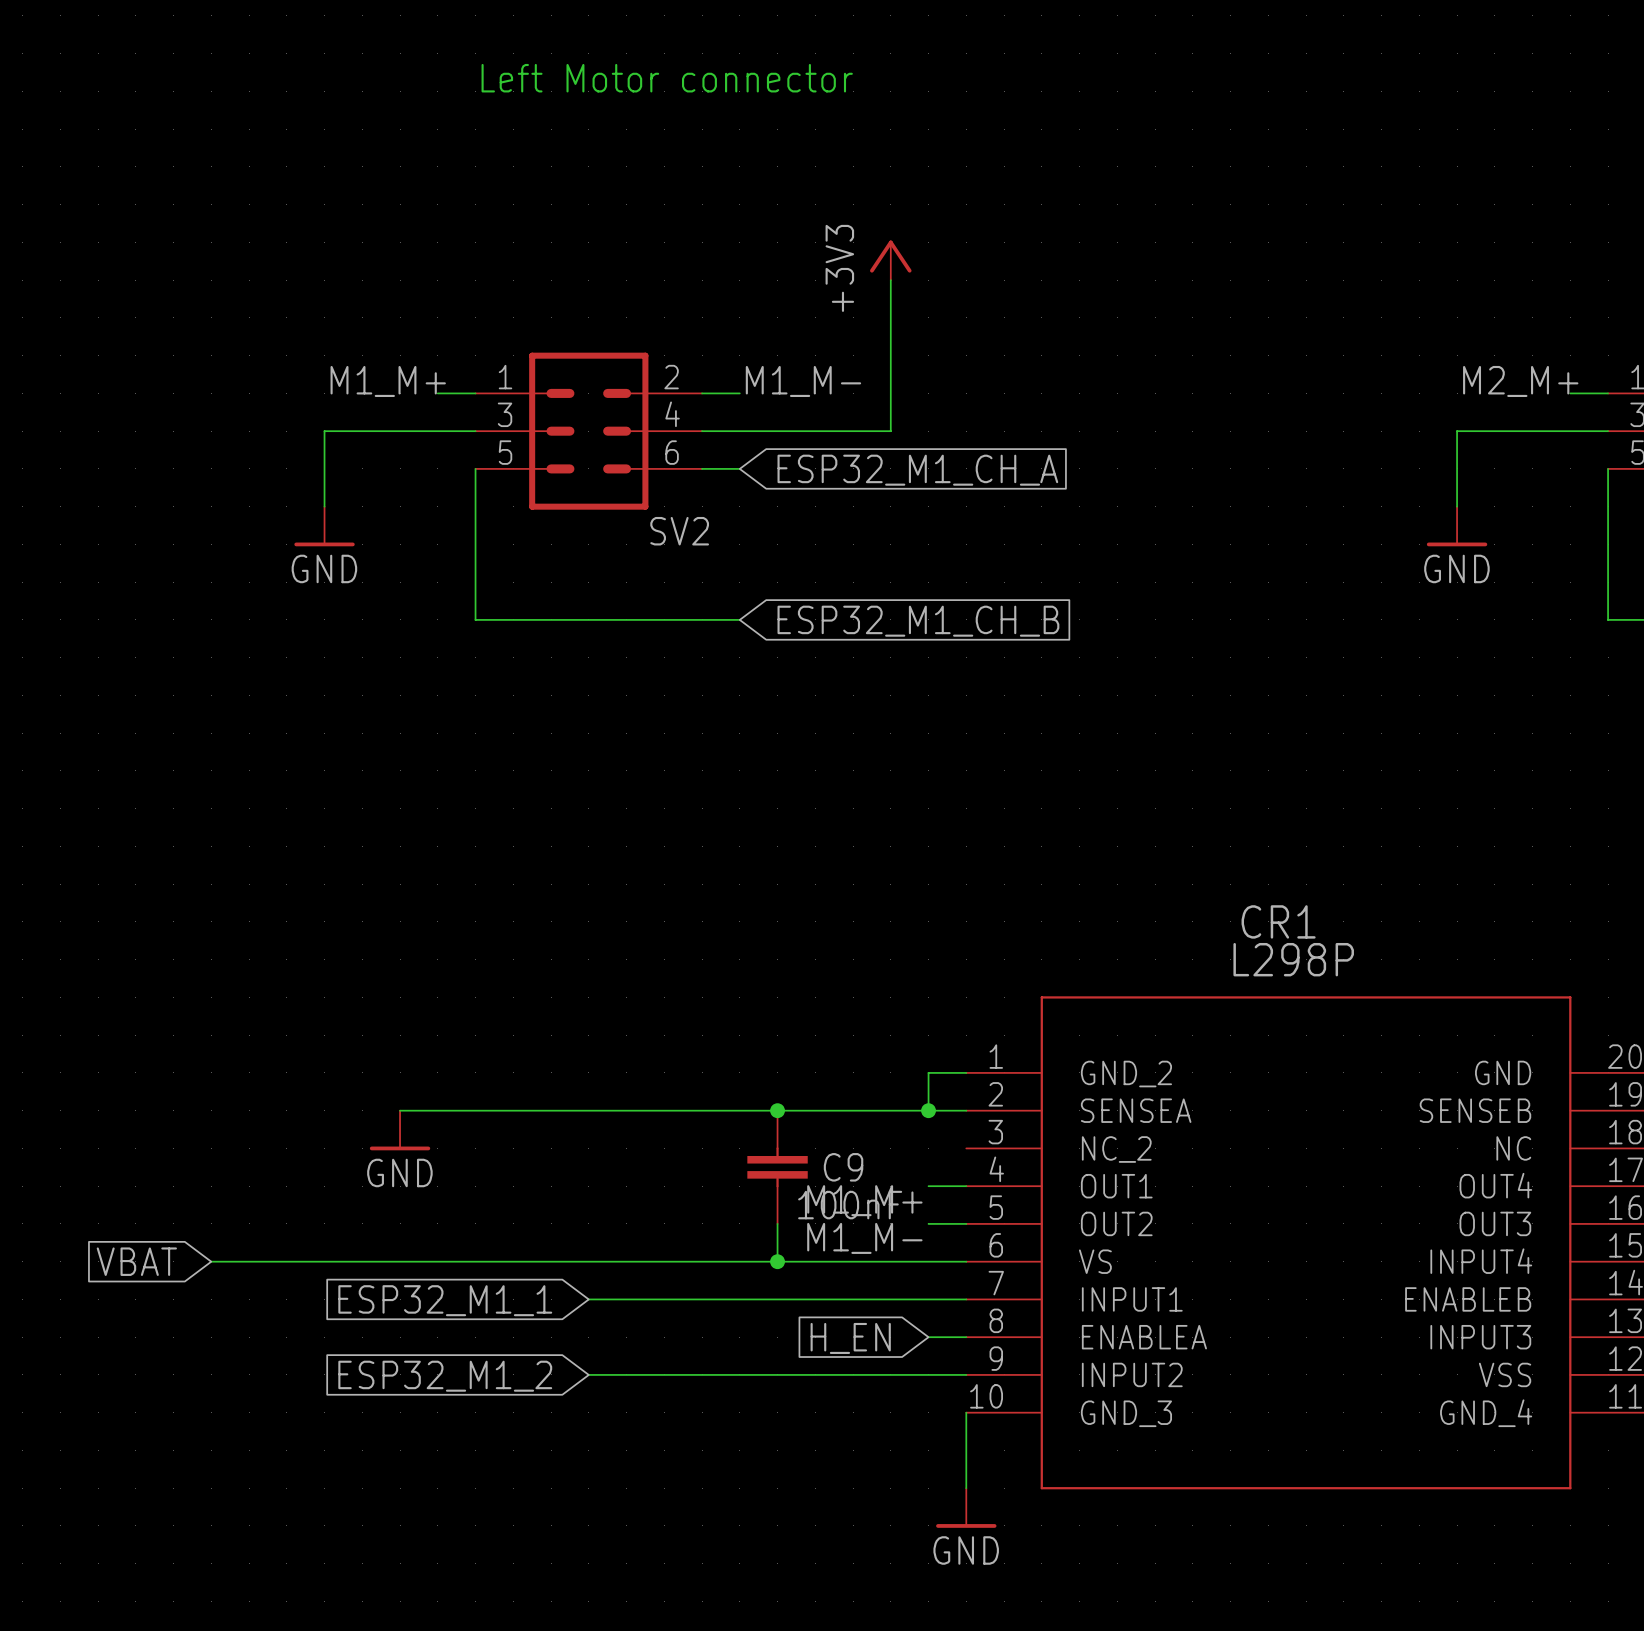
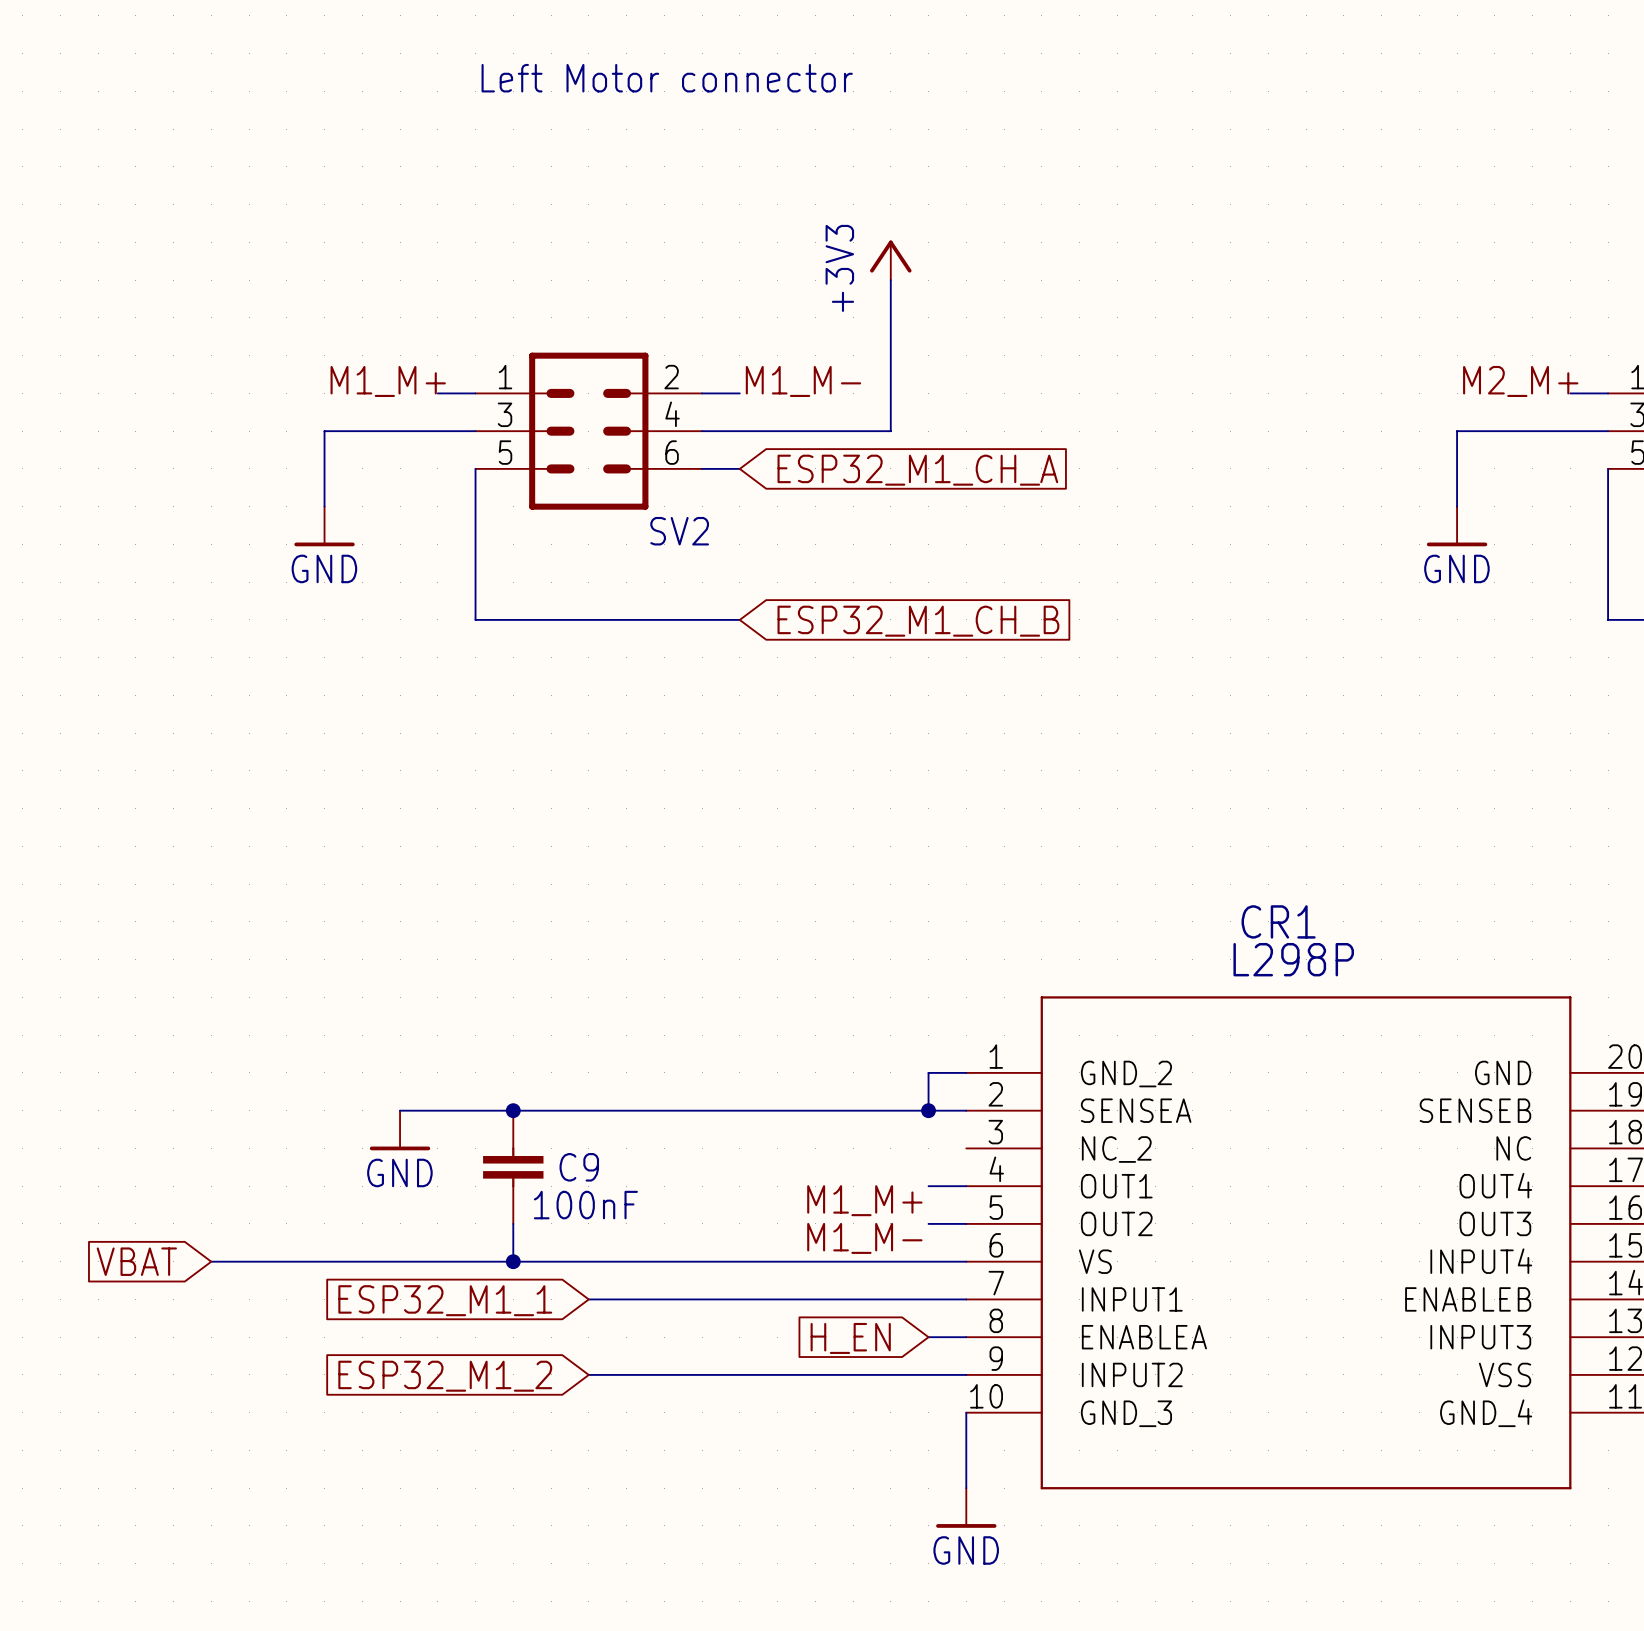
junction: none -> (513, 1110)
junction: (777, 1110) -> none
C9 position: (777, 1167) -> (513, 1167)
wire: (777, 1223) (777, 1261) -> (513, 1223) (513, 1261)
junction: none -> (513, 1261)
junction: (777, 1261) -> none

